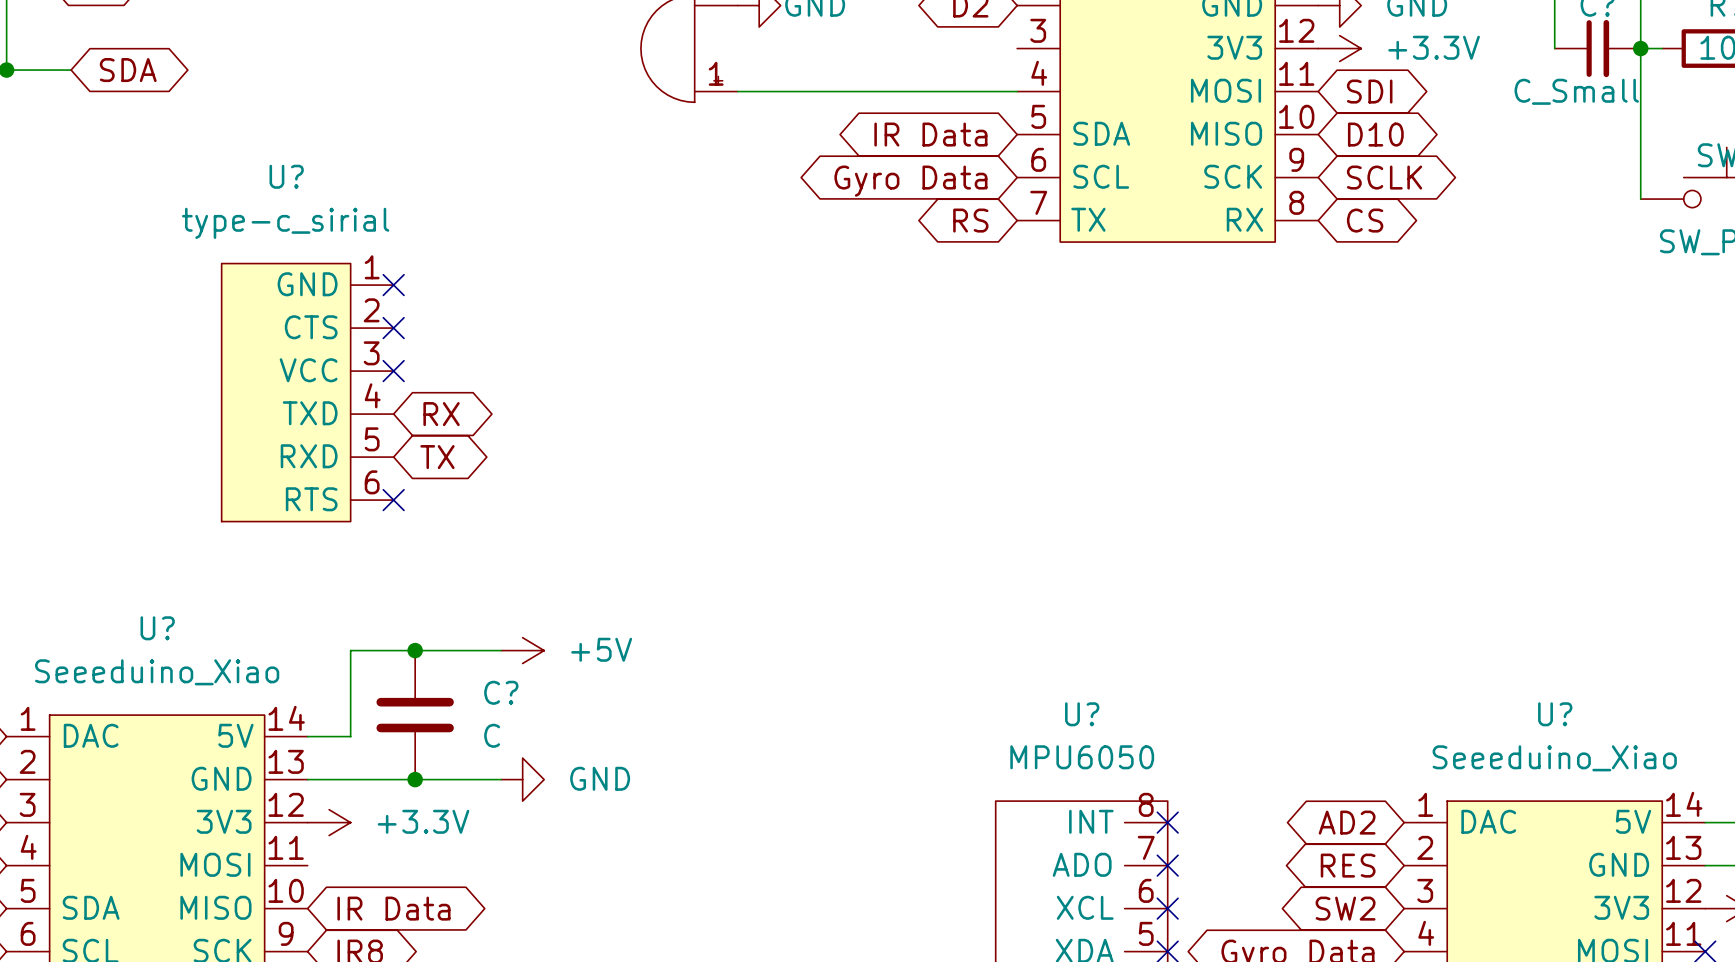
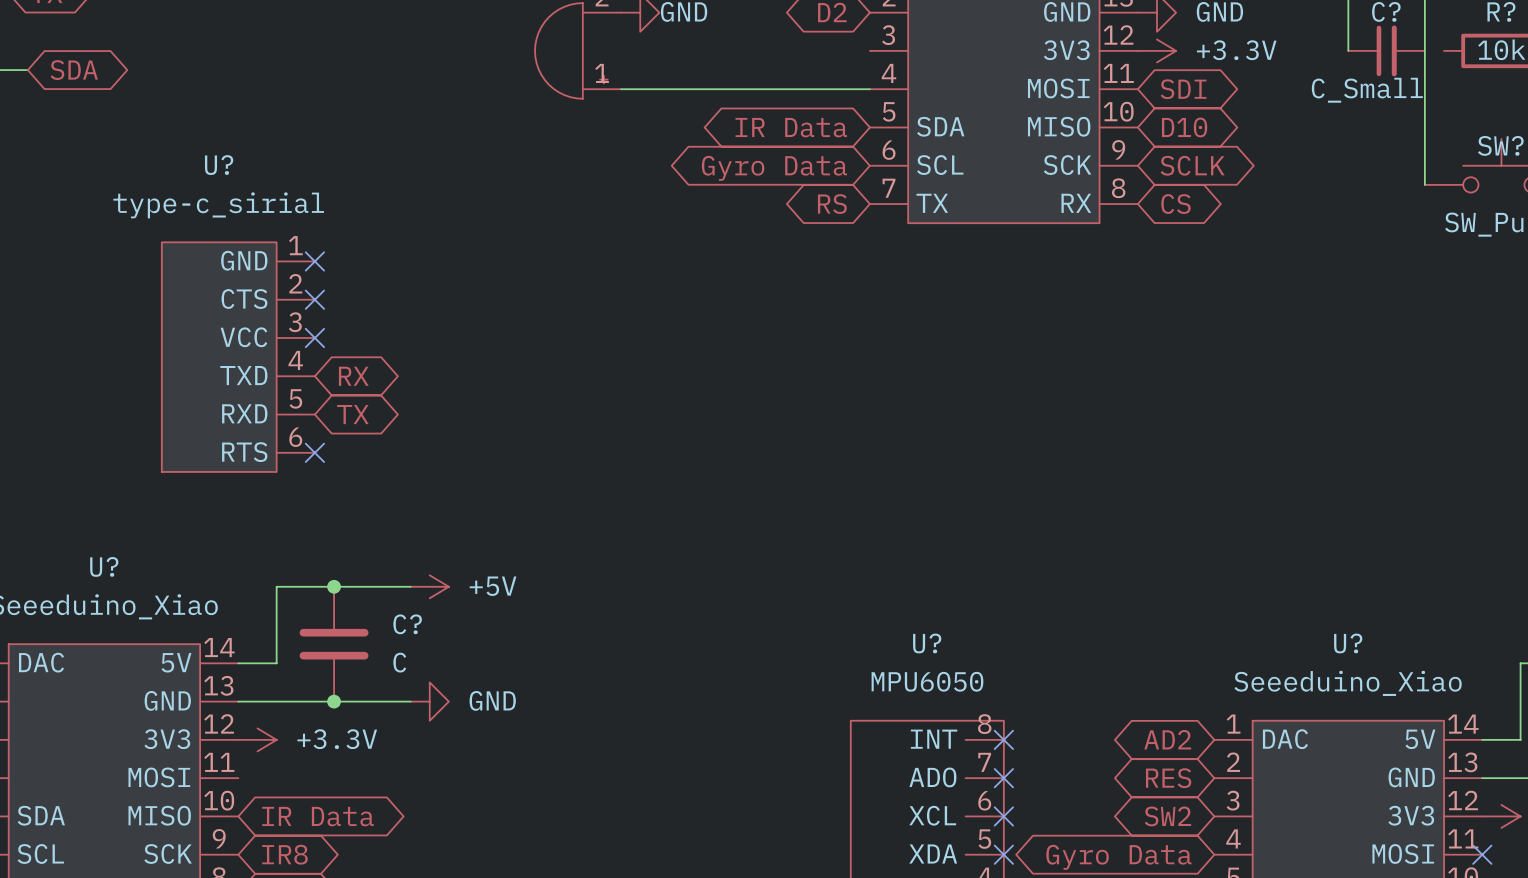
wire: (1640, 48) (1662, 48) -> none
junction: (1640, 48) -> none

